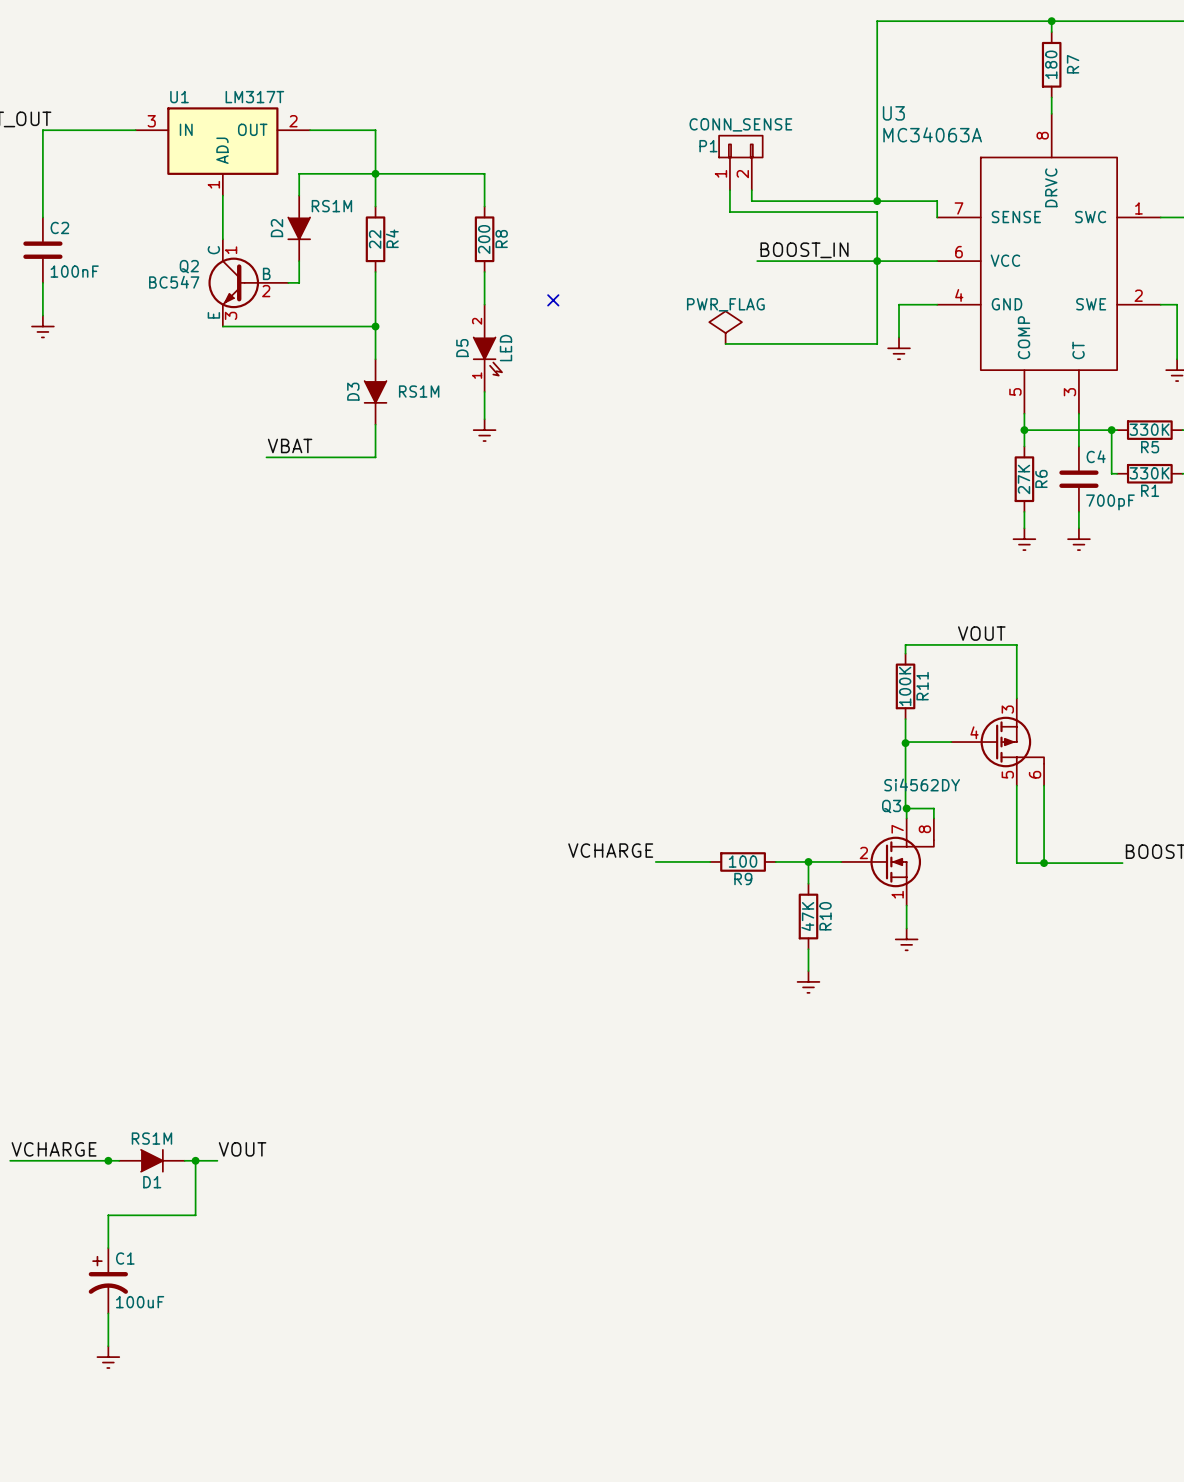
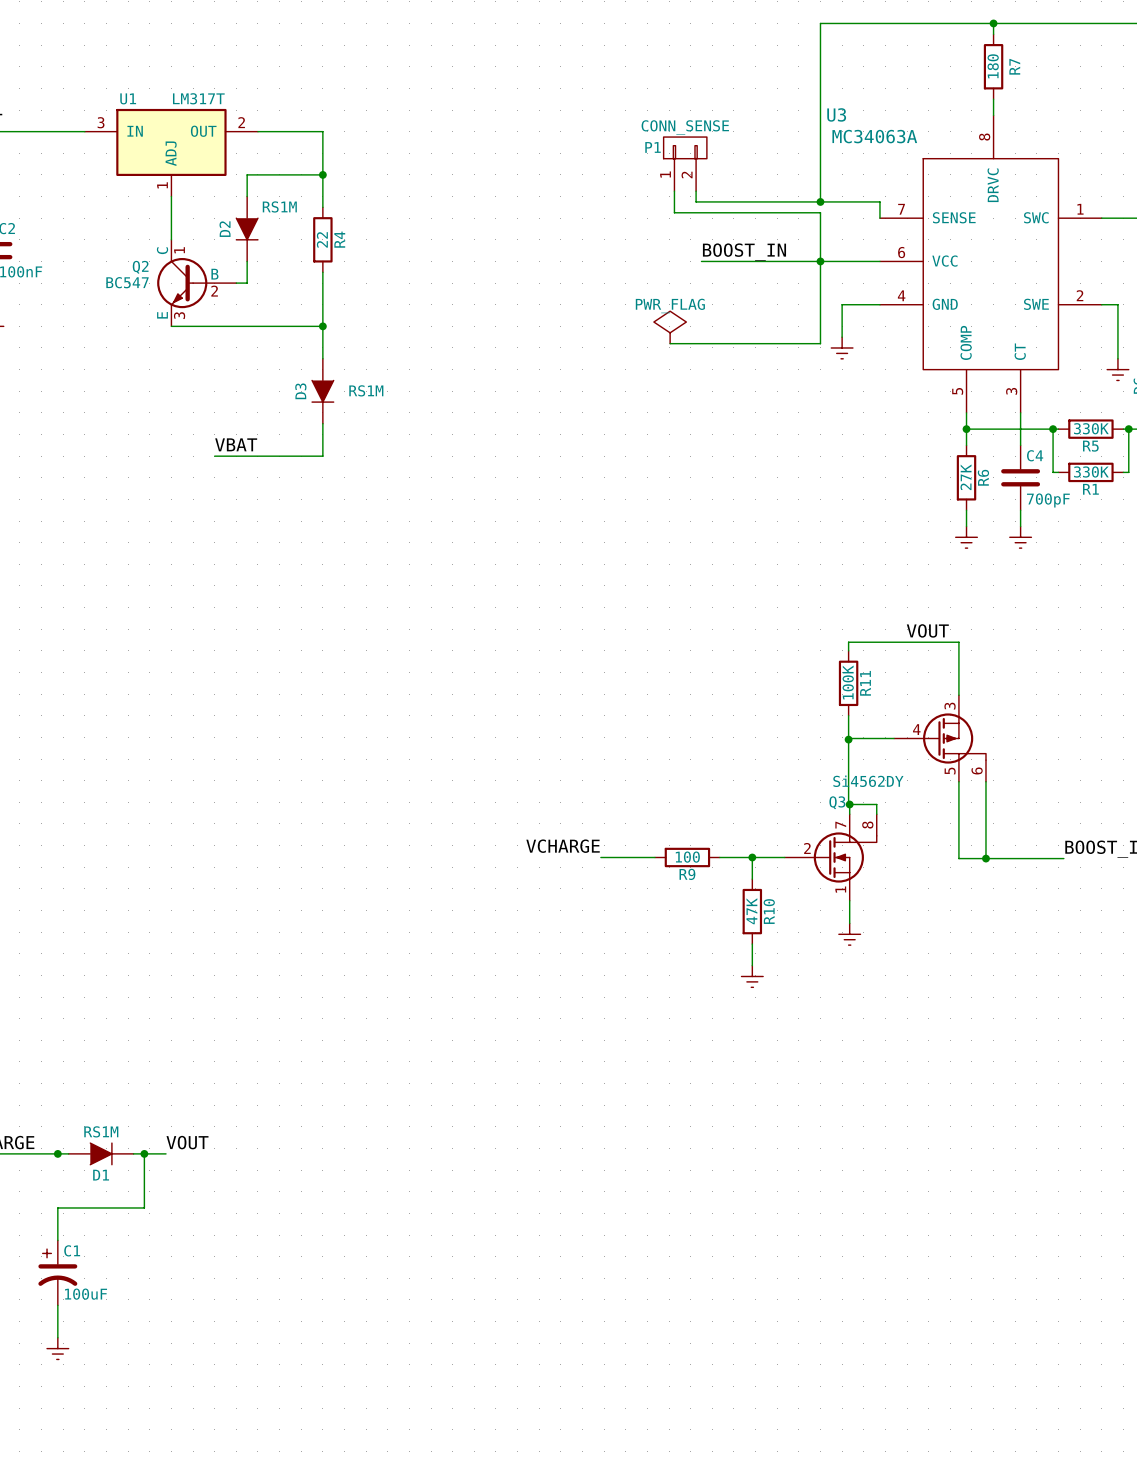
wire: (375, 173) (484, 173) (484, 206) -> none
R8: 200 (484, 239) -> none
wire: (484, 271) (484, 304) -> none
no-connect mark: (553, 300) -> none
D5: LED (487, 348) -> none
wire: (484, 391) (484, 419) -> none
power symbol: (484, 430) -> none

